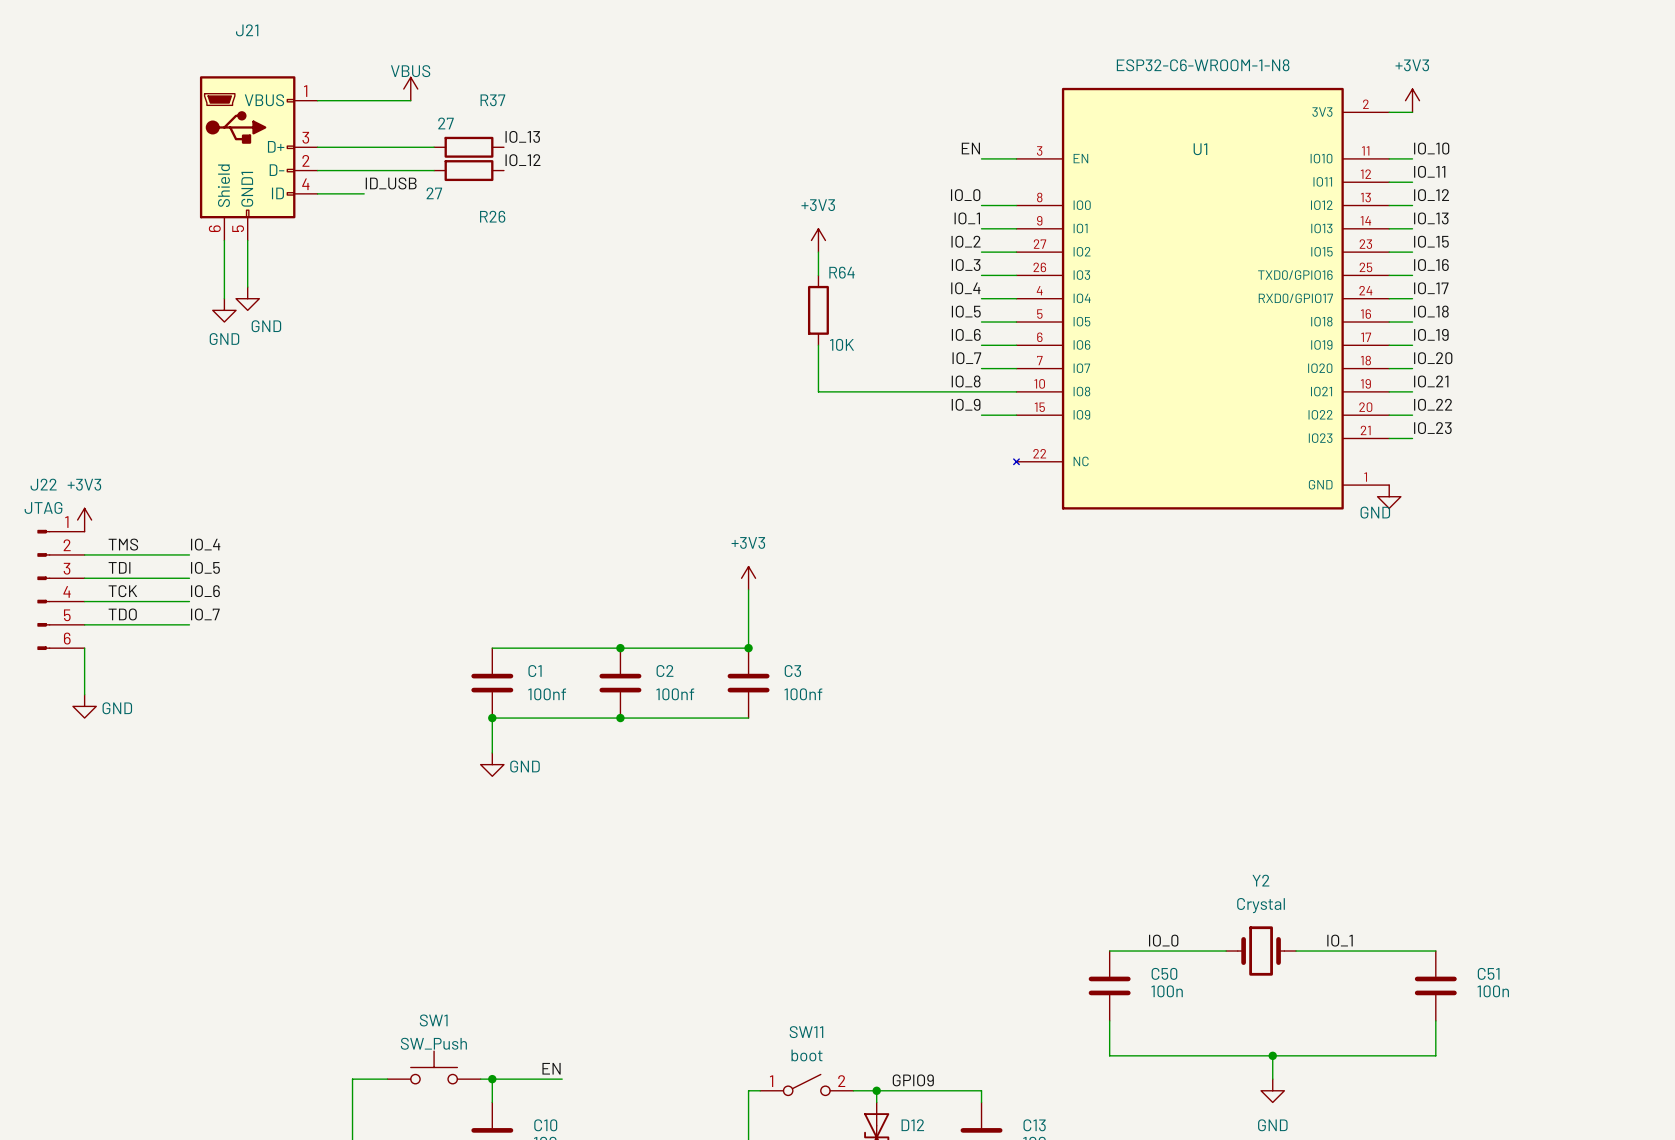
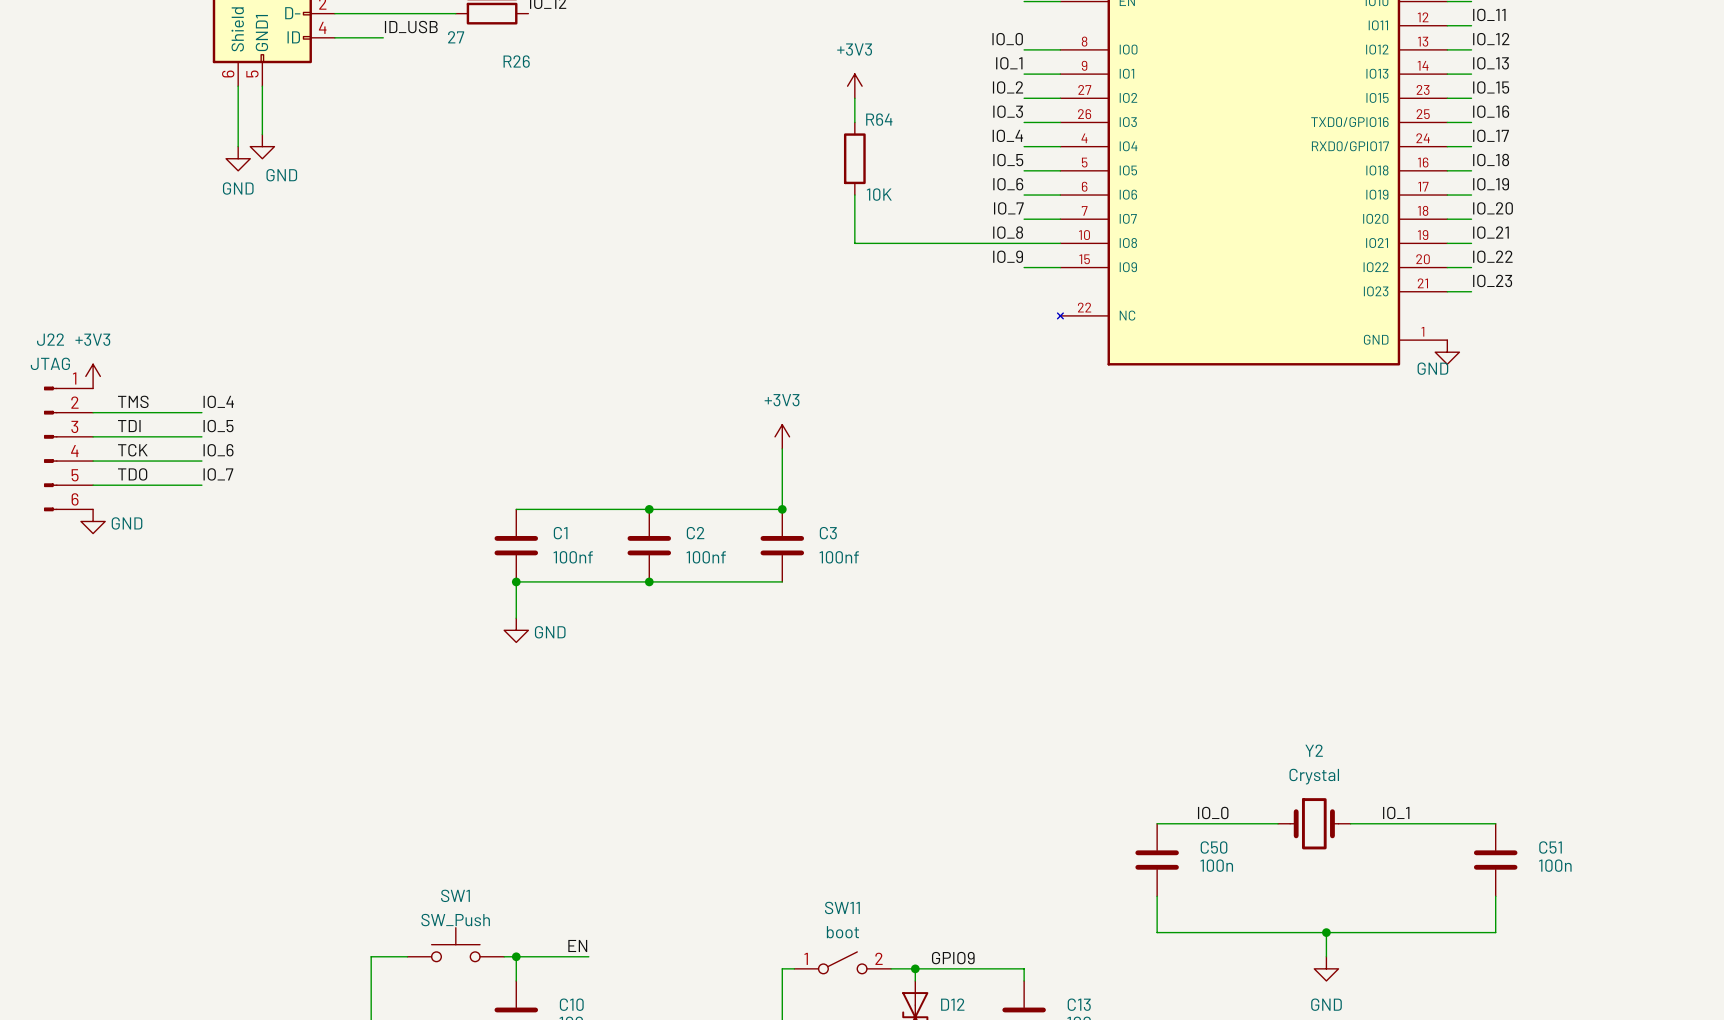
wire: (84, 648) (84, 694) -> none
power symbol position: GND (84, 706) -> GND (93, 521)

